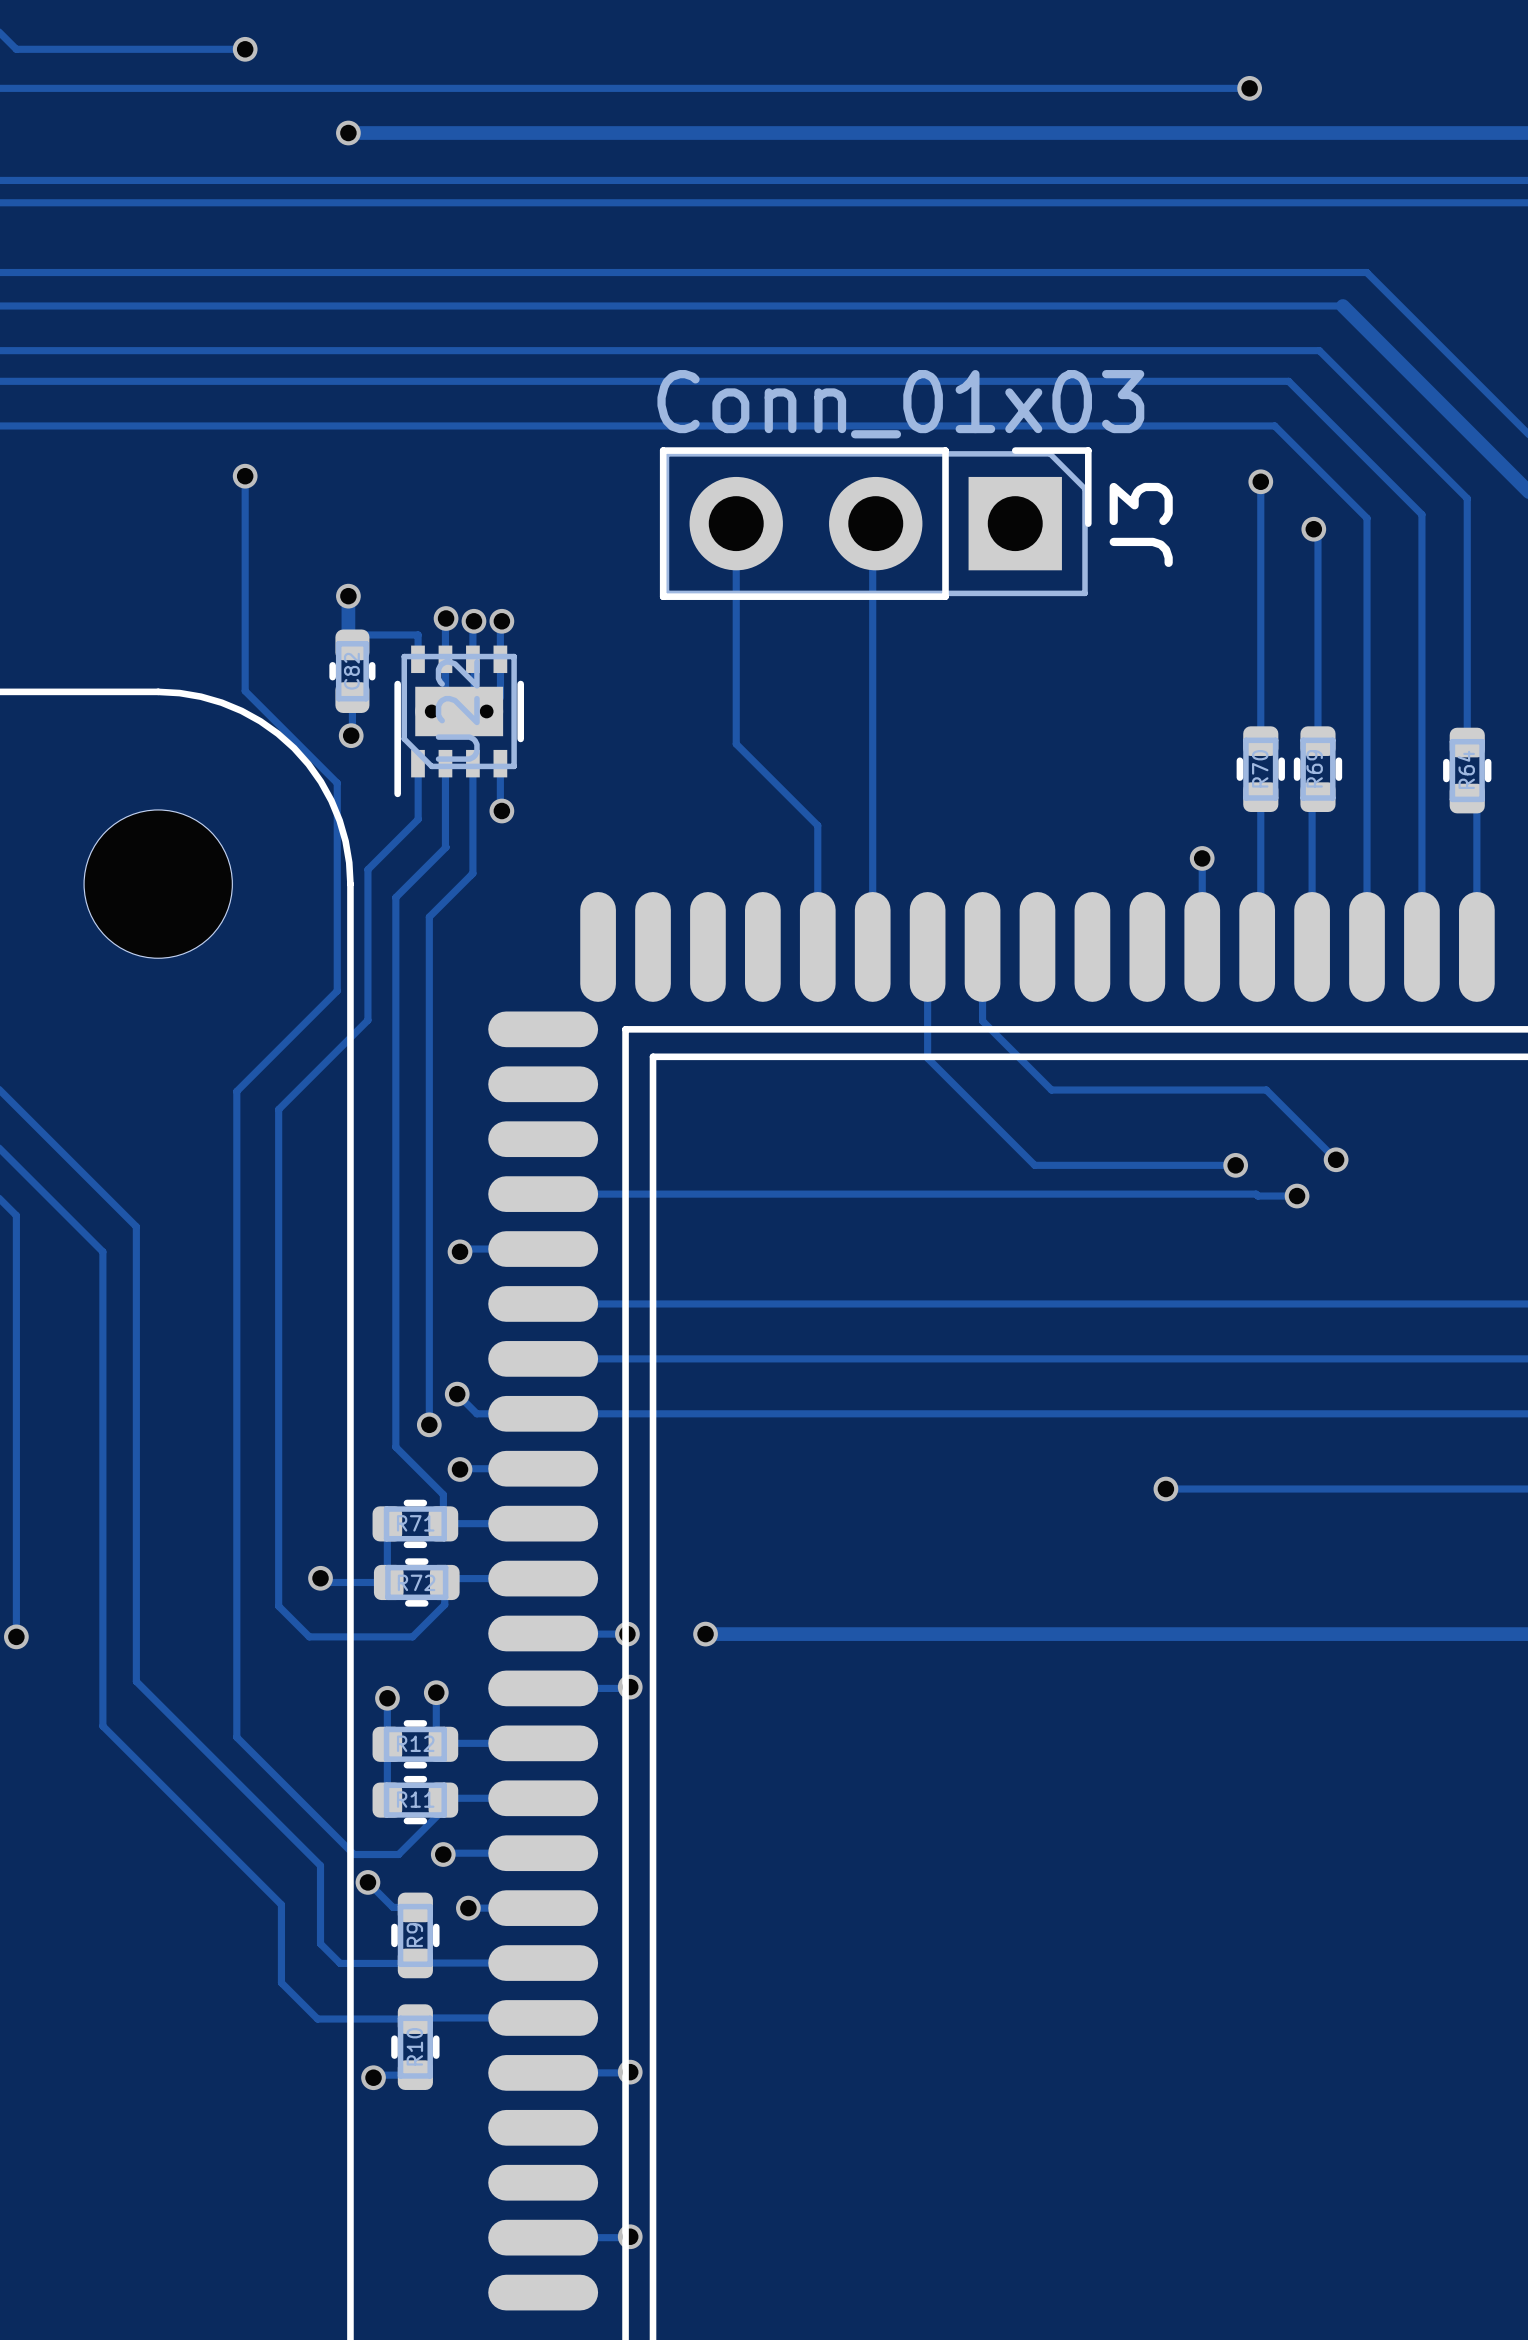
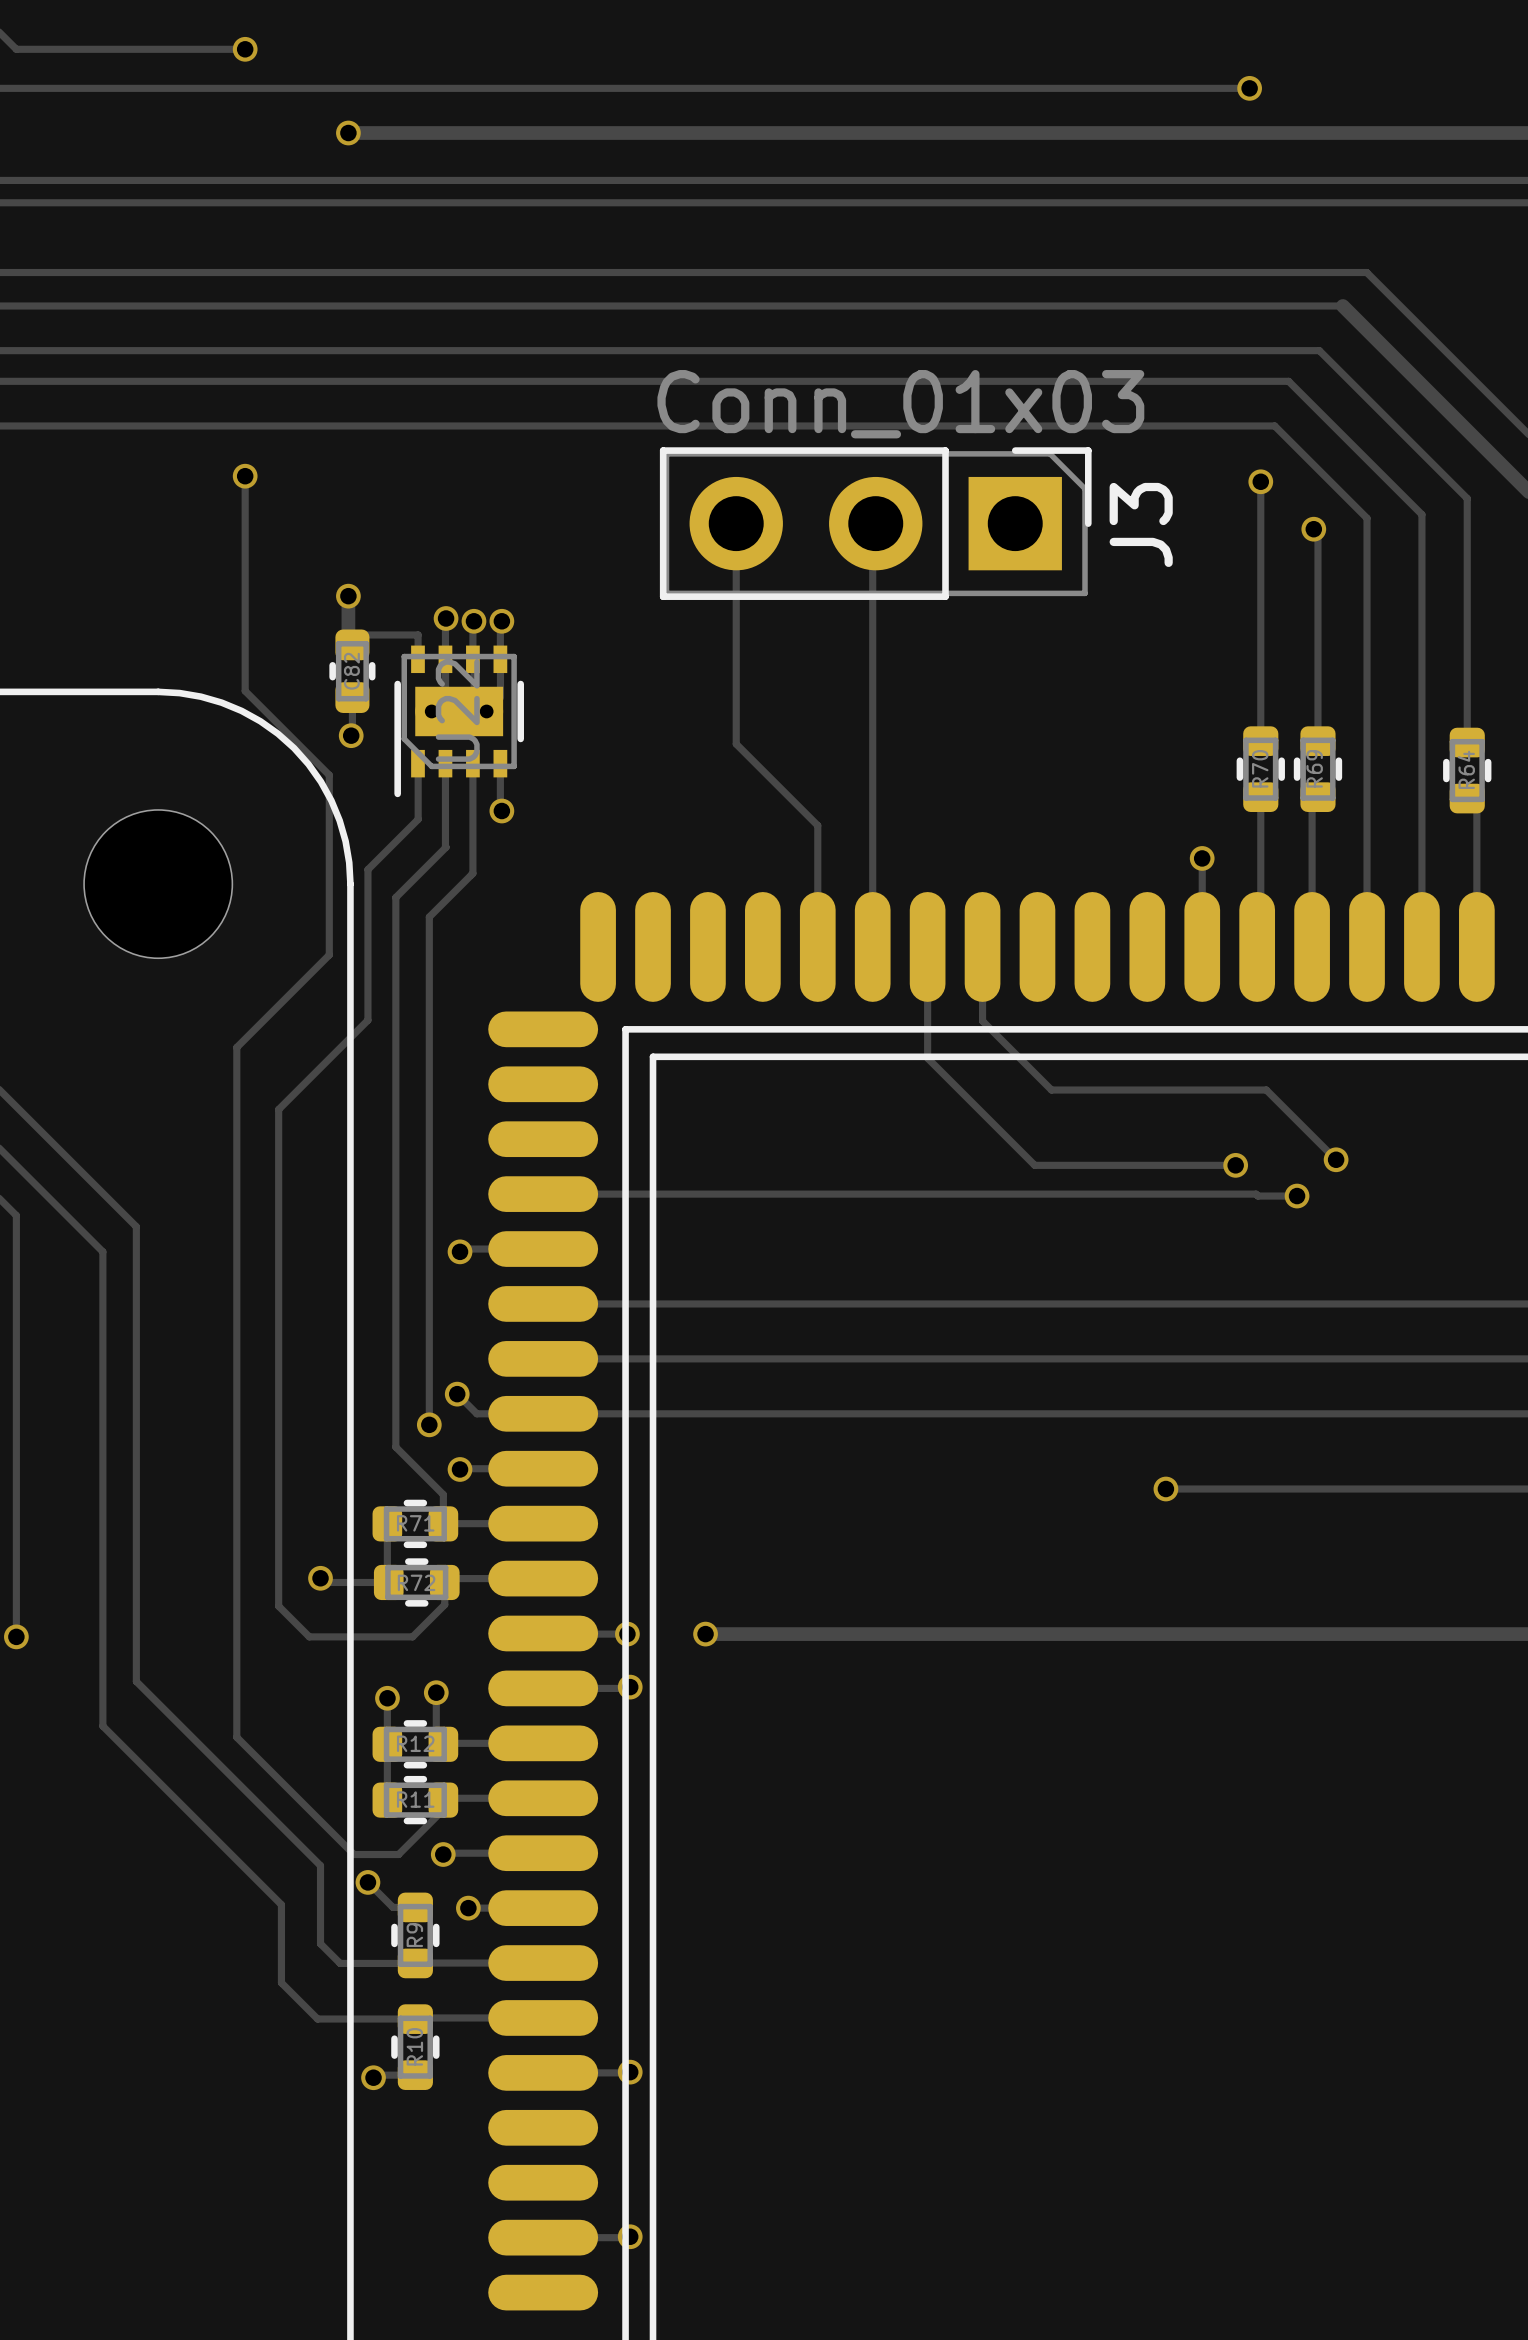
track: (329, 775) (337, 783) (337, 990) (236, 1091) -> (329, 775) (329, 954) (236, 1047) (236, 1091)

